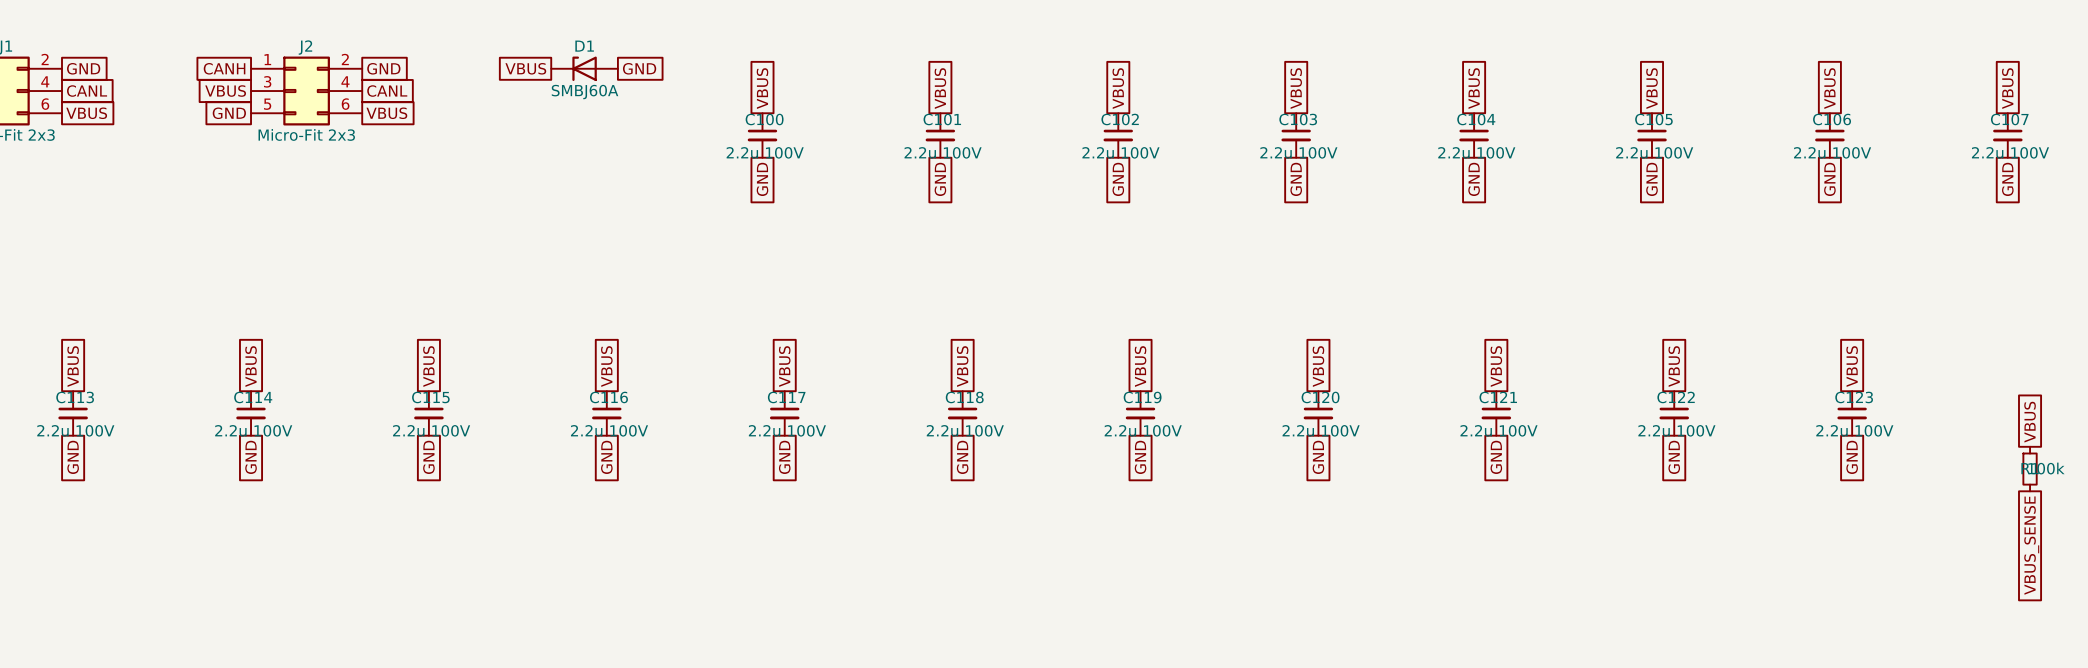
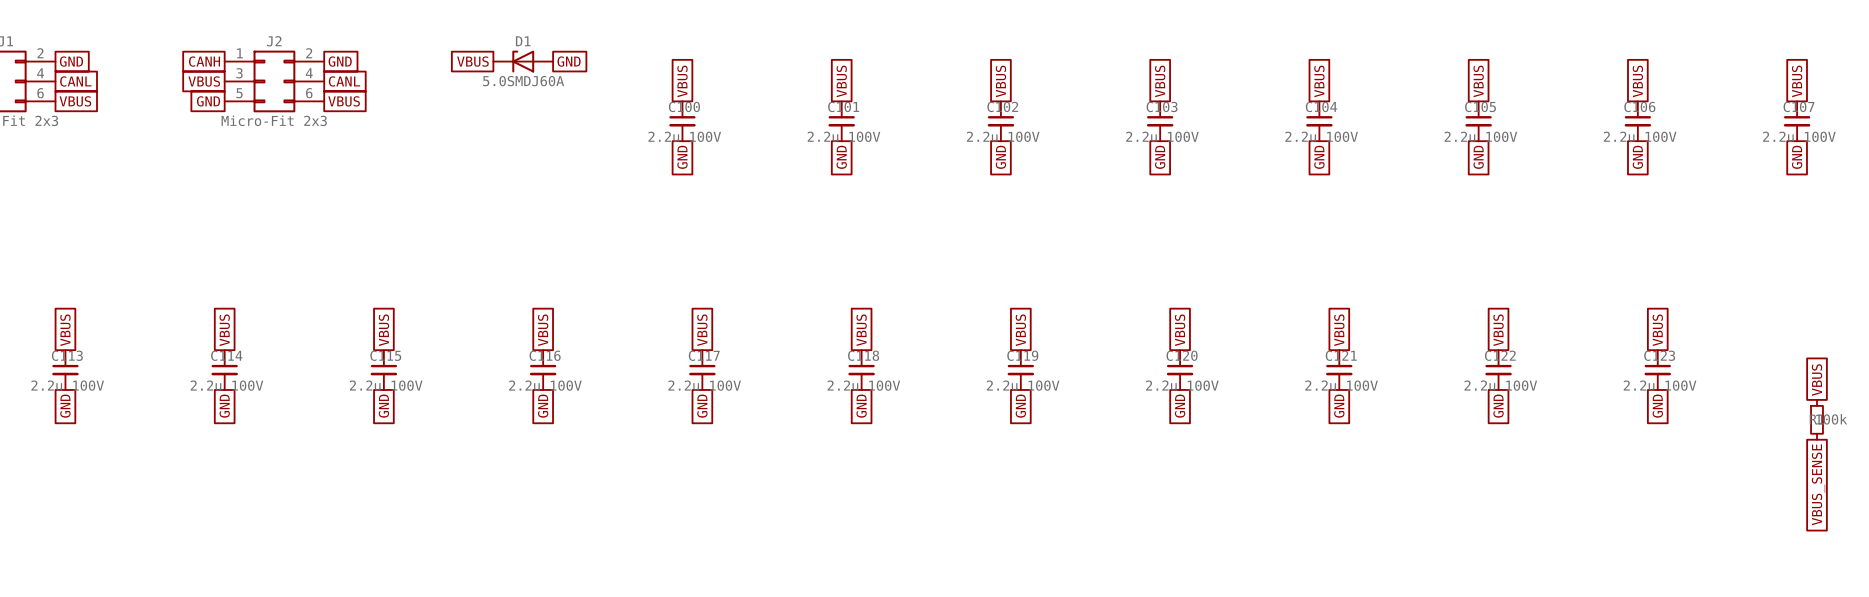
D1 value: SMBJ60A (585, 92) -> 5.0SMDJ60A (523, 81)

